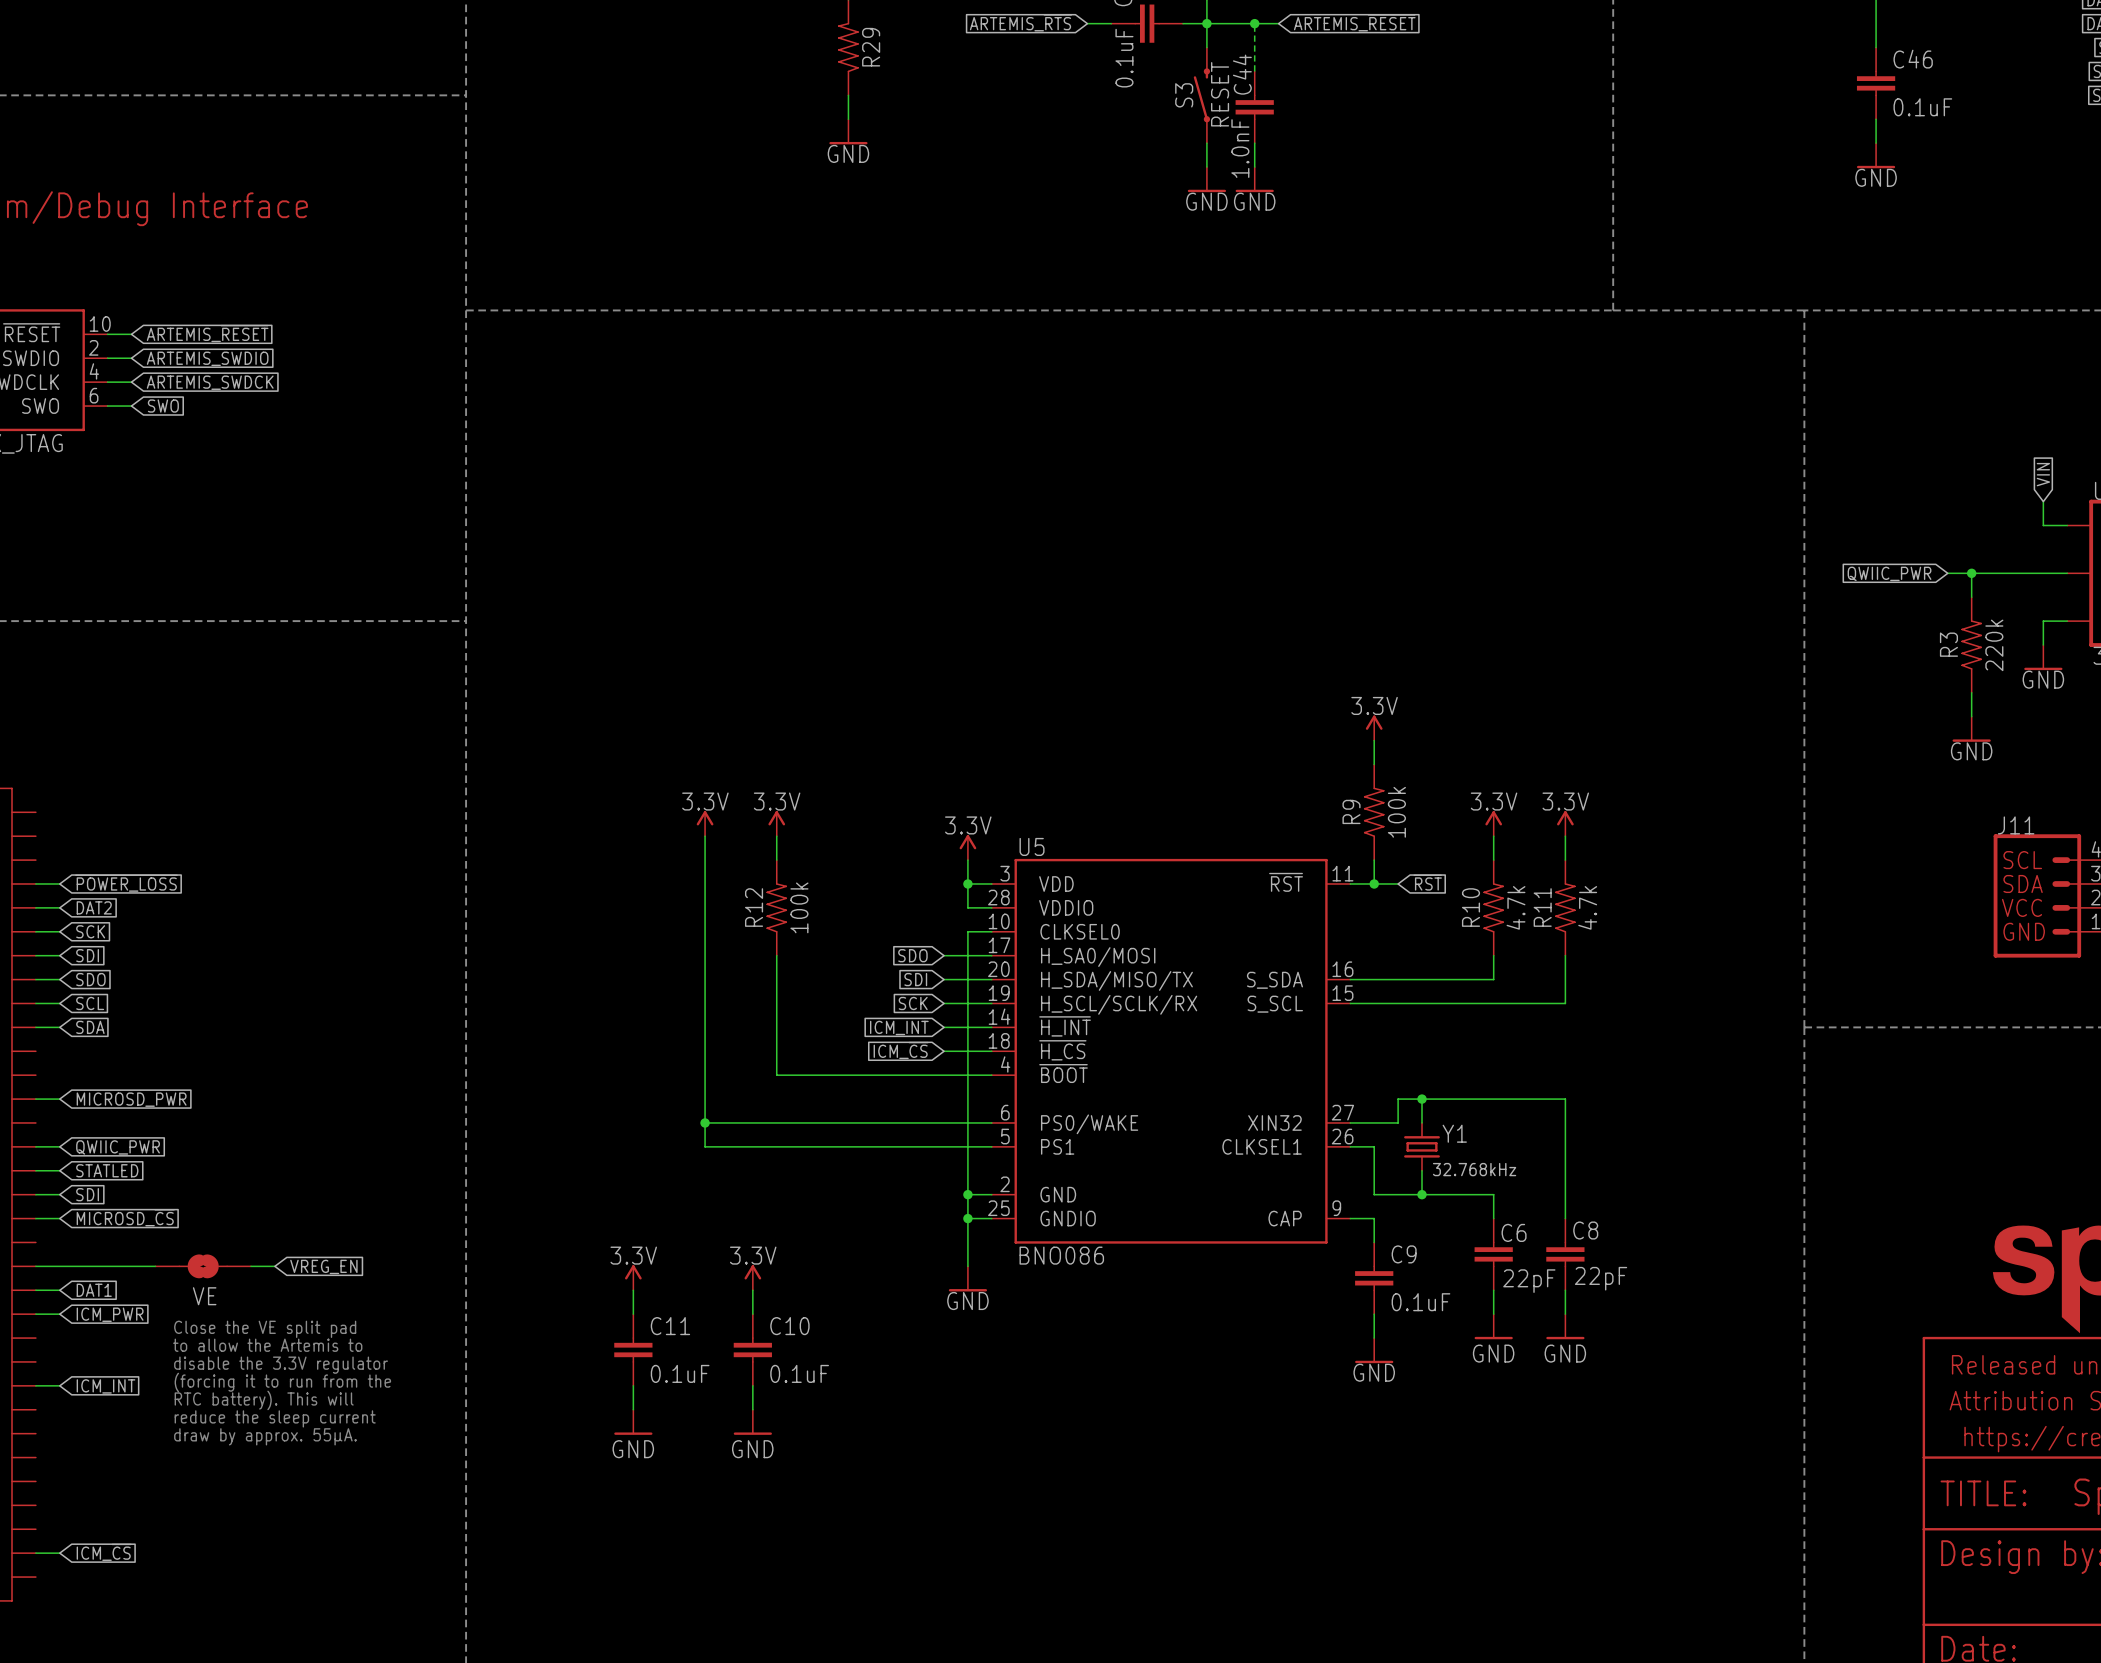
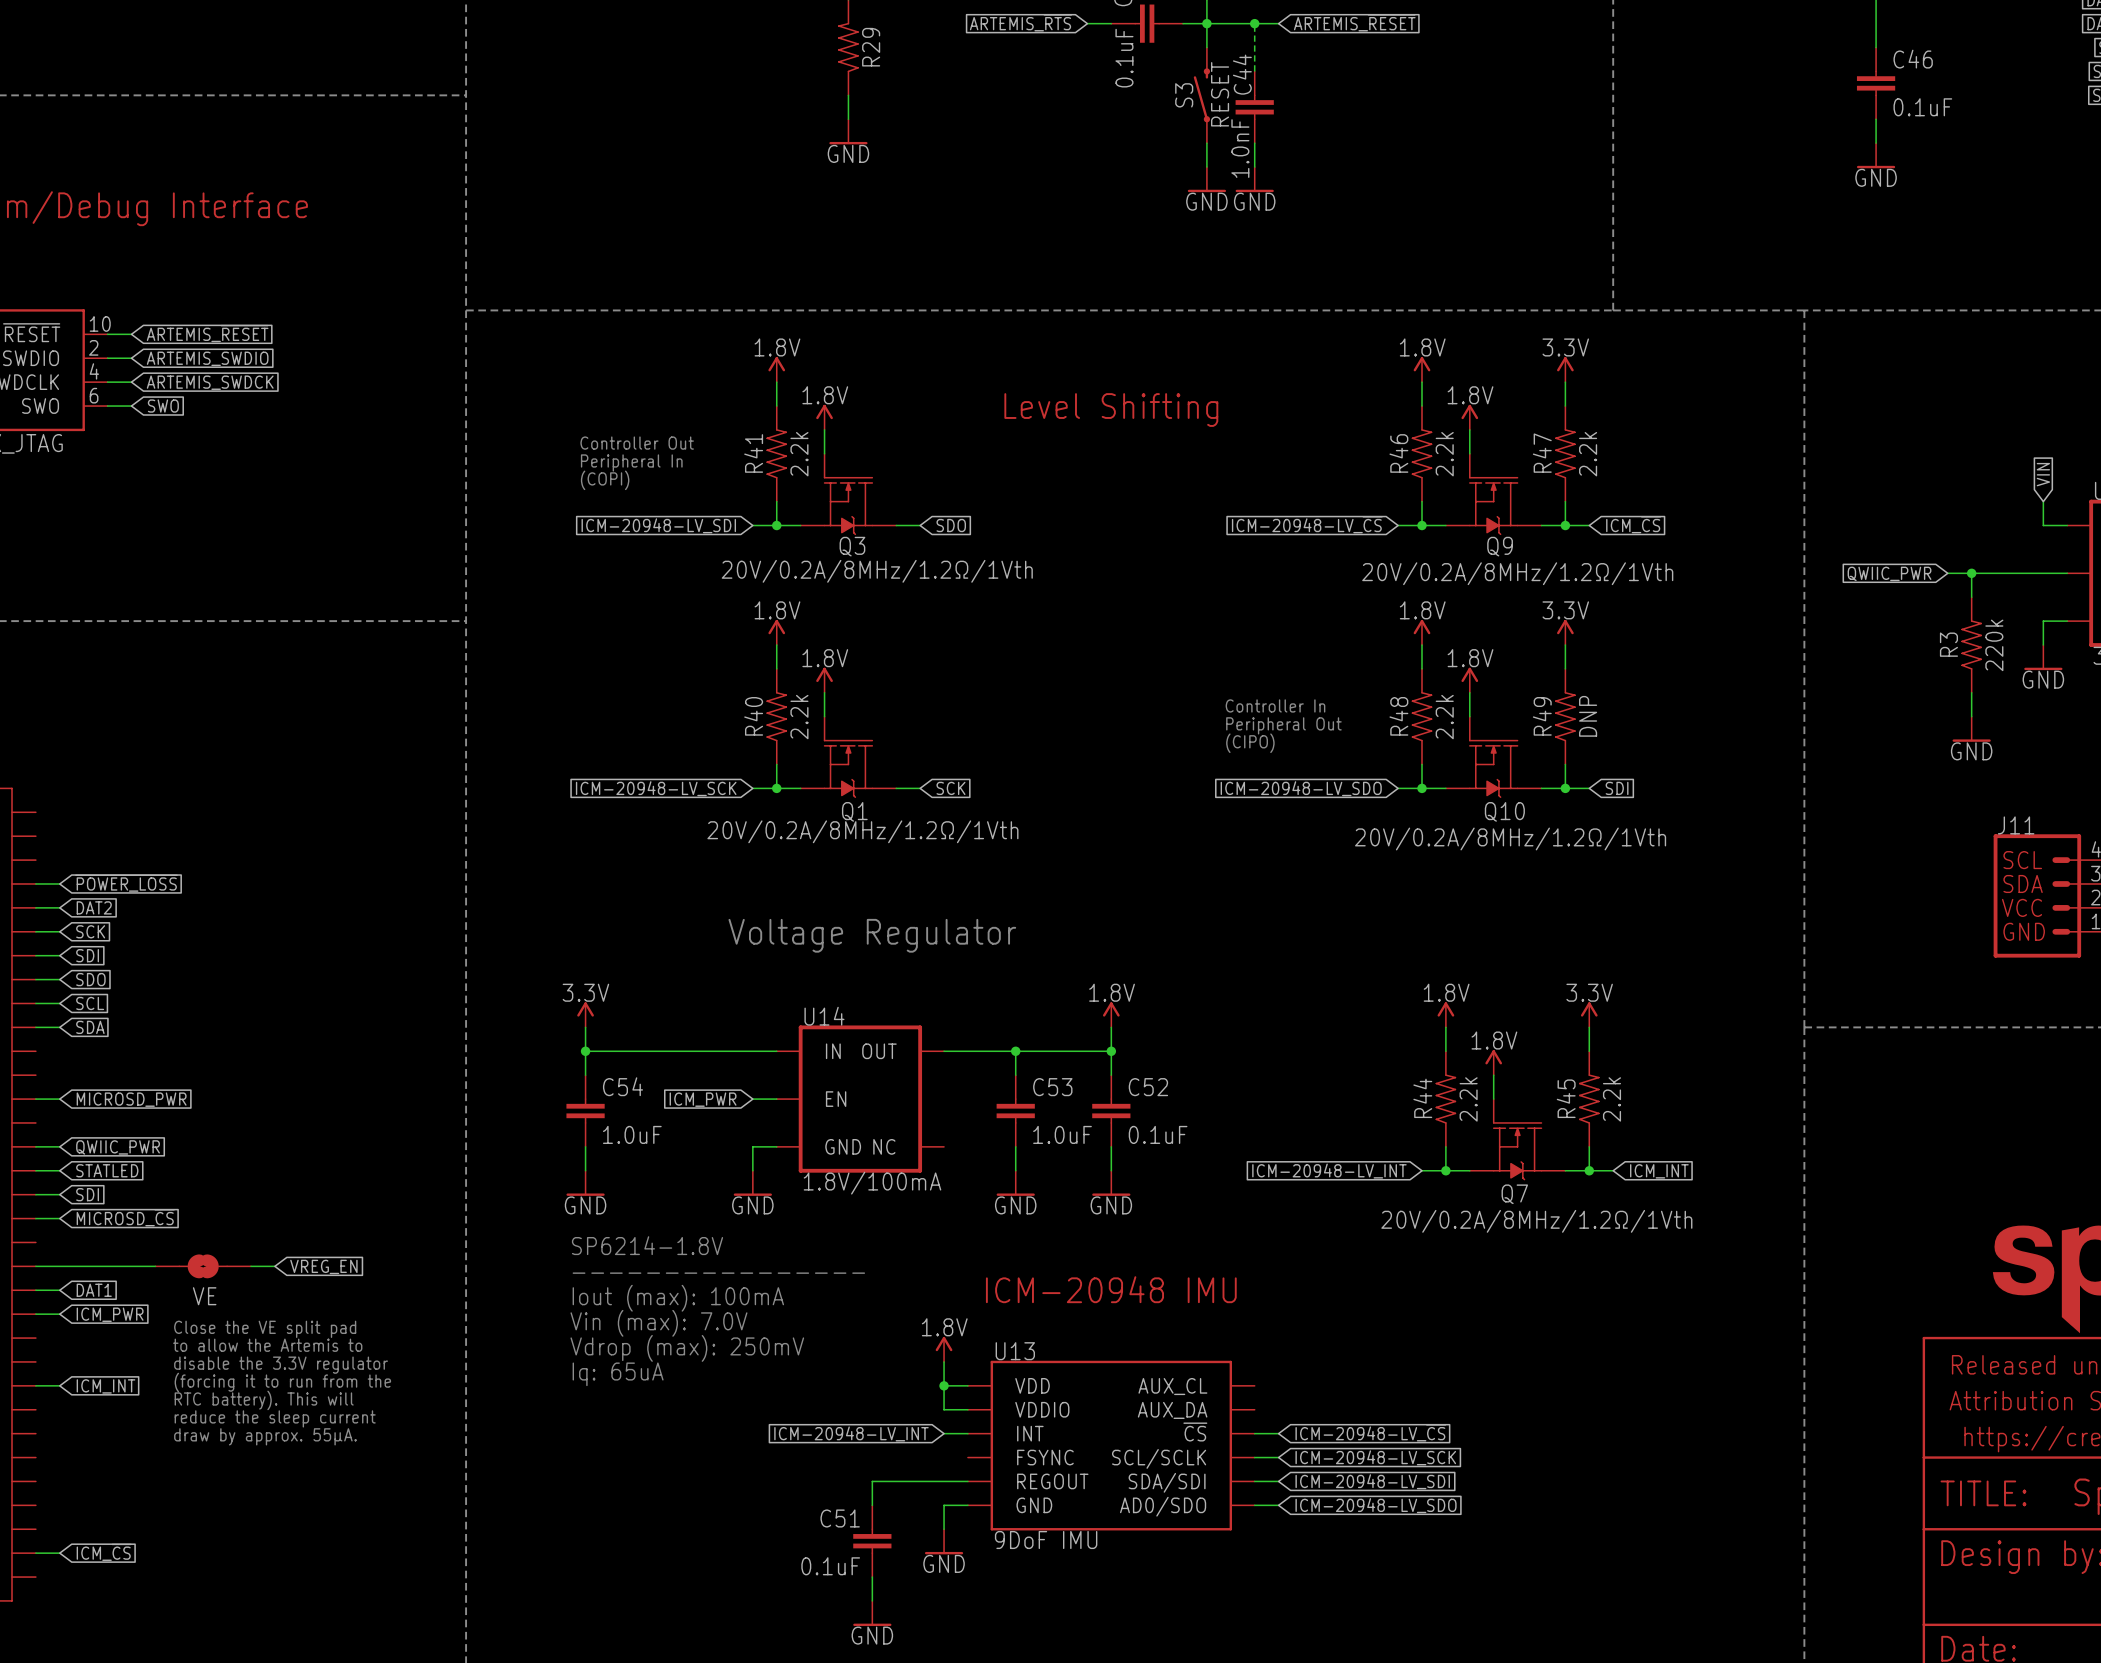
power symbol: none -> 1.8V (776, 369)
power symbol: none -> 1.8V (1422, 369)
power symbol: none -> 3.3V (1565, 369)
wire: none -> (776, 382) (776, 406)
wire: none -> (1422, 382) (1422, 406)
wire: none -> (1565, 382) (1565, 406)
text: none -> Level Shifting (1111, 410)
power symbol: none -> 1.8V (824, 417)
power symbol: none -> 1.8V (1469, 417)
wire: none -> (824, 429) (824, 453)
wire: none -> (1469, 429) (1469, 453)
text: none -> Controller Out (637, 443)
R41: none -> 2.2k (776, 453)
R46: none -> 2.2k (1422, 453)
R47: none -> 2.2k (1565, 453)
text: none -> Peripheral In (631, 462)
text: none -> (COPI) (605, 480)
Q3: none -> 20V/0.2A/8MHz/1.2Ω/1Vth (848, 494)
Q9: none -> 20V/0.2A/8MHz/1.2Ω/1Vth (1493, 494)
wire: none -> (776, 501) (776, 525)
wire: none -> (1422, 501) (1422, 525)
wire: none -> (1565, 501) (1565, 525)
global label: none -> ICM-20948-LV_~{CS} (1307, 524)
global label: none -> ICM_~{CS} (1633, 524)
global label: none -> ICM-20948-LV_SDI (658, 525)
wire: none -> (752, 525) (800, 525)
junction: none -> (776, 525)
wire: none -> (896, 525) (920, 525)
global label: none -> SDO (951, 525)
wire: none -> (1398, 525) (1445, 525)
junction: none -> (1422, 525)
wire: none -> (1541, 525) (1589, 525)
junction: none -> (1565, 525)
power symbol: none -> 1.8V (776, 632)
power symbol: none -> 1.8V (1422, 632)
power symbol: none -> 3.3V (1565, 632)
wire: none -> (776, 645) (776, 668)
wire: none -> (1565, 645) (1565, 668)
power symbol: none -> 1.8V (824, 680)
power symbol: none -> 1.8V (1469, 680)
wire: none -> (824, 692) (824, 716)
text: none -> Controller In (1275, 705)
R40: none -> 2.2k (776, 716)
R48: none -> 2.2k (1422, 716)
R49: none -> DNP (1565, 716)
text: none -> Peripheral Out (1283, 725)
power symbol: 3.3V (1374, 728) -> none
wire: (1374, 740) (1374, 764) -> (1422, 645) (1422, 668)
text: none -> (CIPO) (1250, 743)
Q1: none -> 20V/0.2A/8MHz/1.2Ω/1Vth (848, 757)
Q10: none -> 20V/0.2A/8MHz/1.2Ω/1Vth (1493, 757)
global label: none -> ICM-20948-LV_SCK (656, 788)
wire: none -> (752, 788) (800, 788)
junction: none -> (776, 788)
global label: none -> ICM-20948-LV_SDO (1301, 788)
junction: none -> (1422, 788)
wire: none -> (1541, 788) (1589, 788)
junction: none -> (1565, 788)
global label: none -> SDI (1617, 788)
R9: 100k (1374, 812) -> none
power symbol: 3.3V (705, 823) -> none
power symbol: 3.3V (776, 823) -> none
power symbol: 3.3V (1493, 823) -> none
power symbol: 3.3V (1565, 823) -> none
wire: (705, 836) (705, 1146) (752, 1146) -> (752, 1170) (752, 1146)
wire: (776, 836) (776, 860) -> (776, 764) (776, 788)
wire: (1493, 836) (1493, 860) -> (1469, 692) (1469, 716)
wire: (1565, 836) (1565, 860) -> (1565, 764) (1565, 788)
power symbol: 3.3V (967, 847) -> none
wire: (967, 860) (967, 907) (991, 907) -> none
wire: (1374, 860) (1374, 883) -> (1422, 764) (1422, 788)
global label: ~{RST} (1427, 882) -> none
wire: (967, 883) (991, 883) -> (896, 788) (920, 788)
junction: (967, 883) -> none
wire: (1350, 883) (1398, 883) -> (1398, 788) (1445, 788)
junction: (1374, 883) -> none
R12: 100k (776, 907) -> none
R10: 4.7k (1493, 907) -> none
R11: 4.7k (1565, 907) -> none
wire: (991, 931) (967, 931) (967, 1266) -> none
text: none -> Voltage Regulator (872, 935)
wire: (776, 955) (776, 1075) (991, 1075) -> none
global label: SDO (912, 955) -> none
wire: (944, 955) (991, 955) -> none
wire: (1493, 955) (1493, 979) (1350, 979) -> none
wire: (1565, 955) (1565, 1003) (1350, 1003) -> none
global label: SDI (915, 979) -> none
wire: (944, 979) (991, 979) -> none
global label rotation: 0° (913, 1003) -> 180° (950, 788)
global label position: SCK (913, 1003) -> SCK (950, 788)
wire: (944, 1003) (991, 1003) -> none
power symbol: none -> 3.3V (585, 1014)
power symbol: none -> 1.8V (1111, 1014)
power symbol: none -> 1.8V (1445, 1014)
power symbol: none -> 3.3V (1589, 1014)
wire: none -> (585, 1027) (585, 1075)
global label: ICM_INT (899, 1027) -> none
wire: (944, 1027) (991, 1027) -> none
wire: none -> (1111, 1027) (1111, 1075)
wire: none -> (1589, 1027) (1589, 1051)
global label: ICM_~{CS} (901, 1050) -> none
wire: none -> (585, 1051) (776, 1051)
junction: none -> (585, 1051)
wire: none -> (991, 1051) (1111, 1051)
junction: none -> (1015, 1051)
junction: none -> (1111, 1051)
U5: BNO086 (1171, 1051) -> none
power symbol: none -> 1.8V (1493, 1062)
wire: none -> (1493, 1075) (1493, 1099)
global label: none -> ICM_PWR (703, 1099)
wire: none -> (752, 1099) (776, 1099)
U14: none -> 1.8V/100mA (860, 1099)
wire: (1422, 1099) (1422, 1122) -> (1445, 1027) (1445, 1051)
junction: (1422, 1099) -> none
R44: none -> 2.2k (1445, 1099)
R45: none -> 2.2k (1589, 1099)
C54: none -> 1.0uF (585, 1111)
C53: none -> 1.0uF (1015, 1111)
C52: none -> 0.1uF (1111, 1111)
wire: (705, 1122) (991, 1122) -> none
junction: (705, 1122) -> none
wire: (1350, 1122) (1398, 1122) (1398, 1099) (1565, 1099) (1565, 1218) -> none
Q7: none -> 20V/0.2A/8MHz/1.2Ω/1Vth (1517, 1139)
wire: (776, 1146) (991, 1146) -> none
wire: none -> (1111, 1146) (1111, 1170)
wire: (1350, 1146) (1374, 1146) (1374, 1194) (1493, 1194) (1493, 1218) -> none
Y1: 32.768kHz (1422, 1146) -> none
wire: (1422, 1170) (1422, 1194) -> (1422, 1170) (1469, 1170)
wire: none -> (1565, 1170) (1613, 1170)
junction: none -> (1589, 1170)
global label: none -> ICM-20948-LV_INT (1329, 1171)
global label: none -> ICM_INT (1659, 1171)
power symbol: none -> GND (585, 1183)
power symbol: none -> GND (752, 1183)
power symbol: none -> GND (1015, 1183)
power symbol: none -> GND (1111, 1183)
wire: (967, 1194) (991, 1194) -> none
junction: (967, 1194) -> none
junction position: (1422, 1194) -> (1445, 1170)
wire: (967, 1218) (991, 1218) -> (944, 1385) (967, 1385)
junction: (967, 1218) -> none
wire: (1350, 1218) (1374, 1218) (1374, 1242) -> none
text: none -> SP6214-1.8V (647, 1245)
C6: 22pF (1493, 1254) -> none
C8: 22pF (1565, 1254) -> none
text: none -> ---------------- (718, 1273)
power symbol: 3.3V (633, 1277) -> none
power symbol: 3.3V (752, 1277) -> none
power symbol: GND (967, 1278) -> none
C9: 0.1uF (1374, 1278) -> none
text: none -> ICM-20948 IMU (1111, 1289)
wire: (633, 1290) (633, 1314) -> (585, 1146) (585, 1170)
wire: (752, 1290) (752, 1314) -> none
wire: (1493, 1290) (1493, 1314) -> (1445, 1146) (1445, 1170)
wire: (1565, 1290) (1565, 1314) -> (1589, 1146) (1589, 1170)
text: none -> Iout (max): 100mA (678, 1298)
wire: (1374, 1314) (1374, 1338) -> none
text: none -> Vin (max): 7.0V (658, 1323)
power symbol: GND (1493, 1326) -> none
power symbol: GND (1565, 1326) -> none
text: none -> Vdrop (max): 250mV (687, 1348)
power symbol: none -> 1.8V (944, 1349)
C11: 0.1uF (633, 1350) -> none
C10: 0.1uF (752, 1350) -> none
power symbol: GND (1374, 1350) -> none
wire: none -> (944, 1361) (944, 1409) (967, 1409)
text: none -> Iq: 65uA (618, 1374)
wire: (633, 1385) (633, 1409) -> none
wire: (752, 1385) (752, 1409) -> (872, 1577) (872, 1600)
junction: none -> (944, 1385)
power symbol: GND (633, 1422) -> none
power symbol: GND (752, 1422) -> none
global label: none -> ICM-20948-LV_~{CS} (1370, 1432)
global label: none -> ICM-20948-LV_INT (851, 1433)
wire: none -> (944, 1433) (967, 1433)
wire: none -> (1254, 1433) (1278, 1433)
U13: none -> 9DoF IMU (1111, 1445)
wire: none -> (1254, 1457) (1278, 1457)
global label: none -> ICM-20948-LV_SCK (1375, 1457)
wire: none -> (967, 1481) (872, 1481) (872, 1505)
wire: none -> (1254, 1481) (1278, 1481)
global label: none -> ICM-20948-LV_SDI (1372, 1481)
wire: none -> (967, 1505) (944, 1505) (944, 1529)
wire: none -> (1254, 1505) (1278, 1505)
global label: none -> ICM-20948-LV_SDO (1376, 1505)
C51: none -> 0.1uF (872, 1541)
power symbol: none -> GND (944, 1541)
power symbol: none -> GND (872, 1613)

